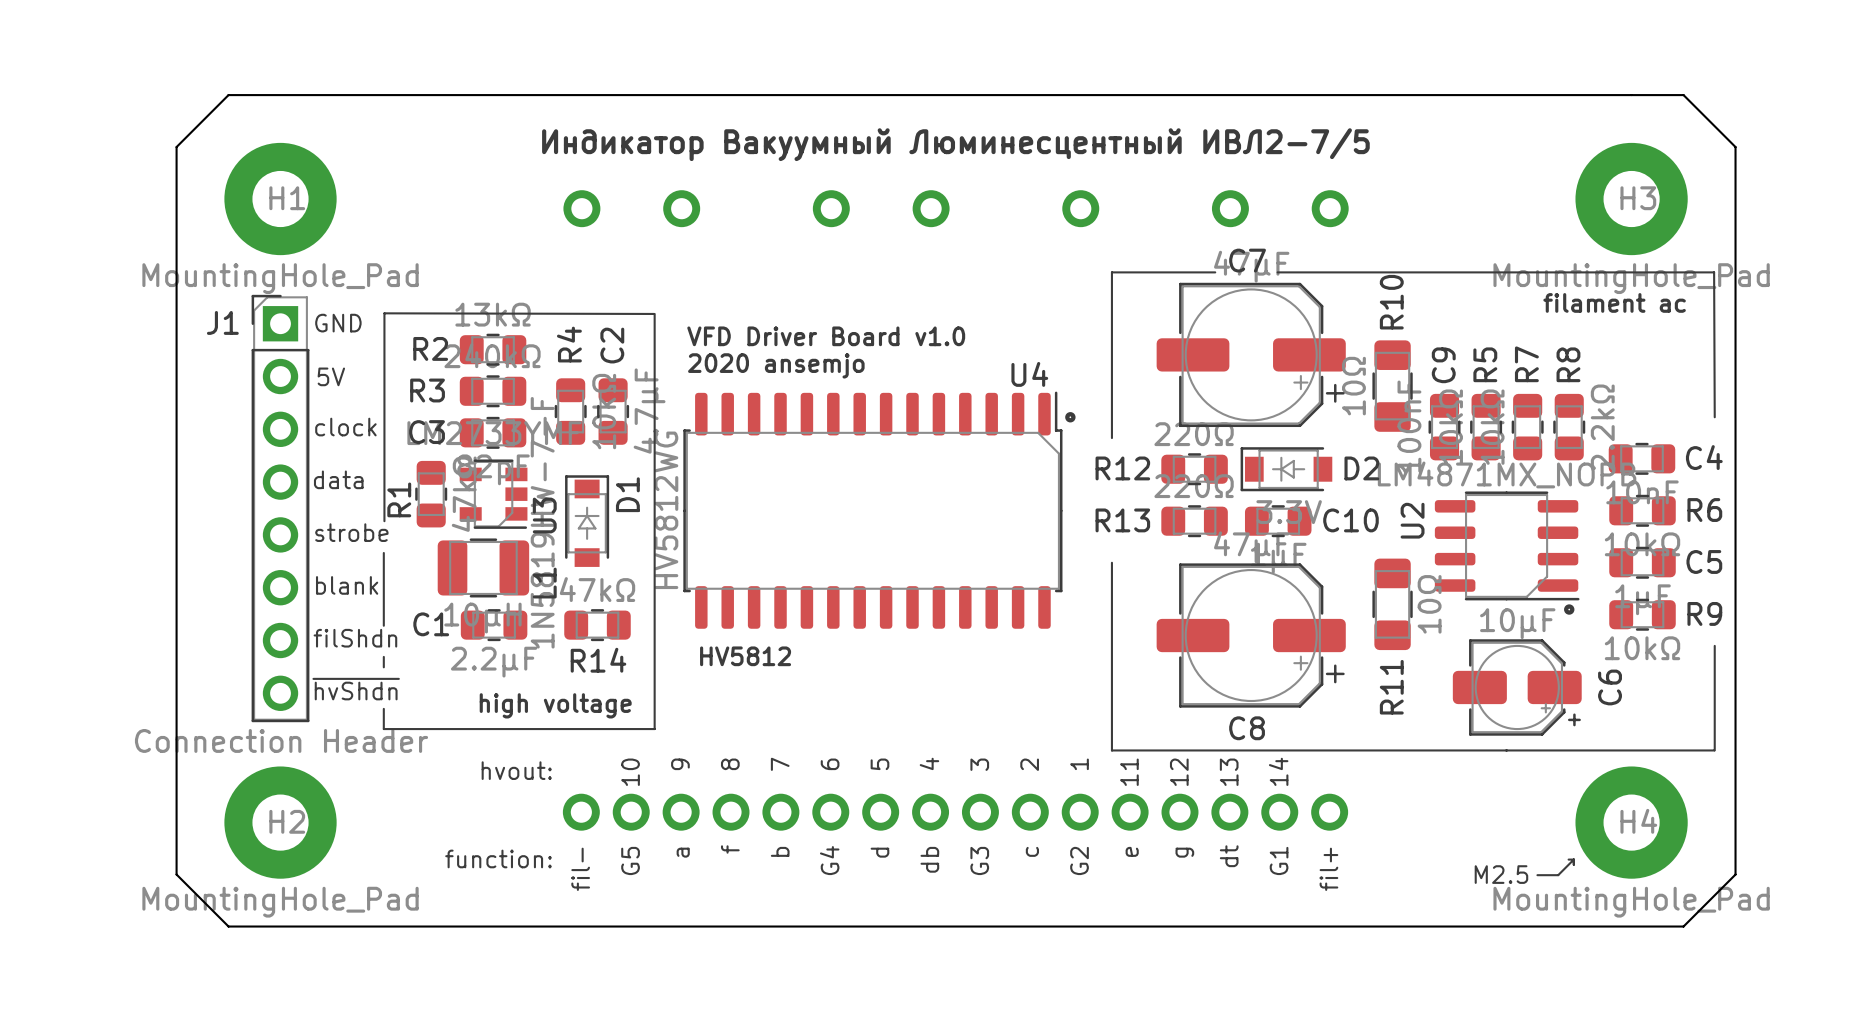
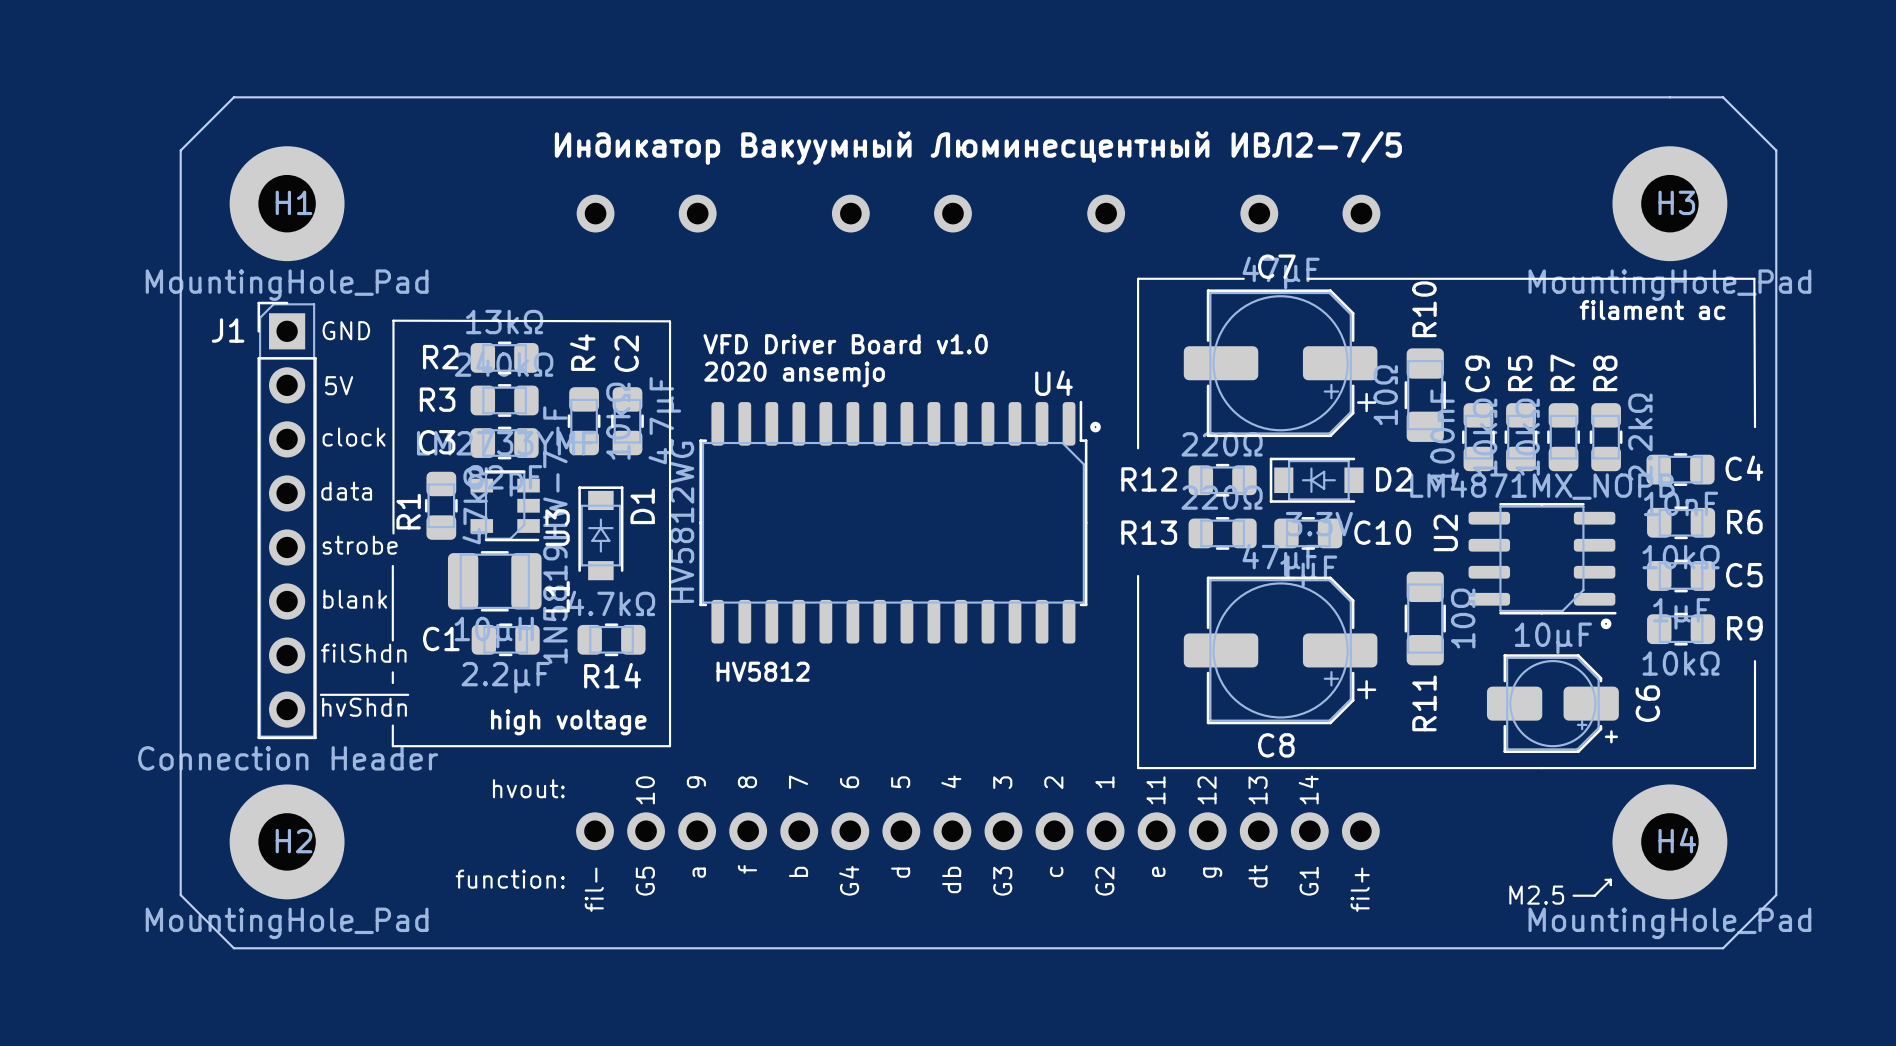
R14 value: 47kΩ (597, 589) -> 4.7kΩ (611, 603)

